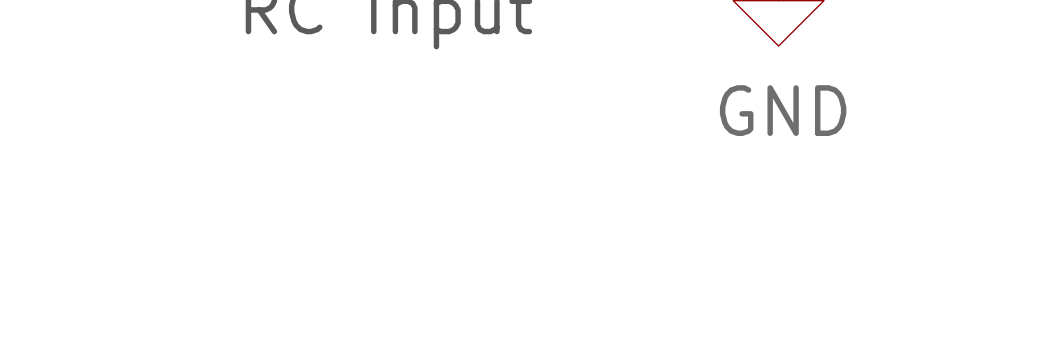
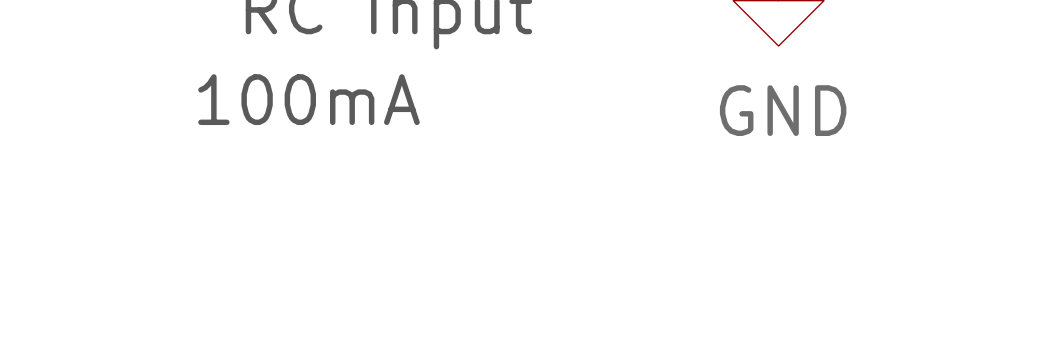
text: none -> 100mA (308, 99)

